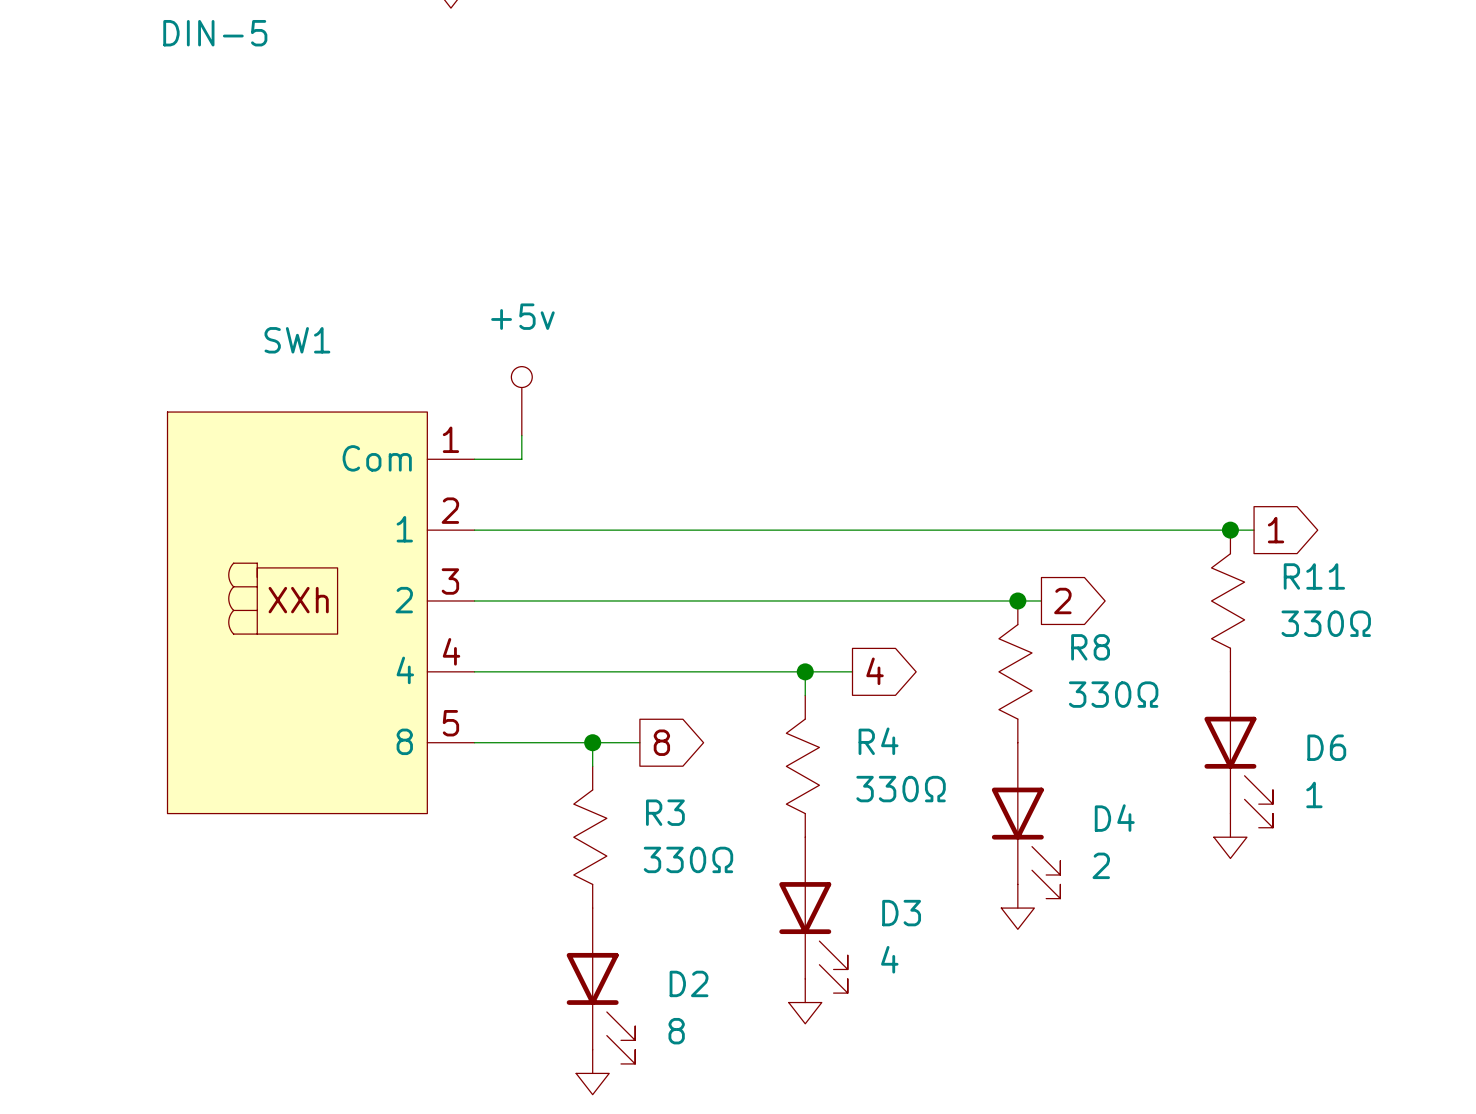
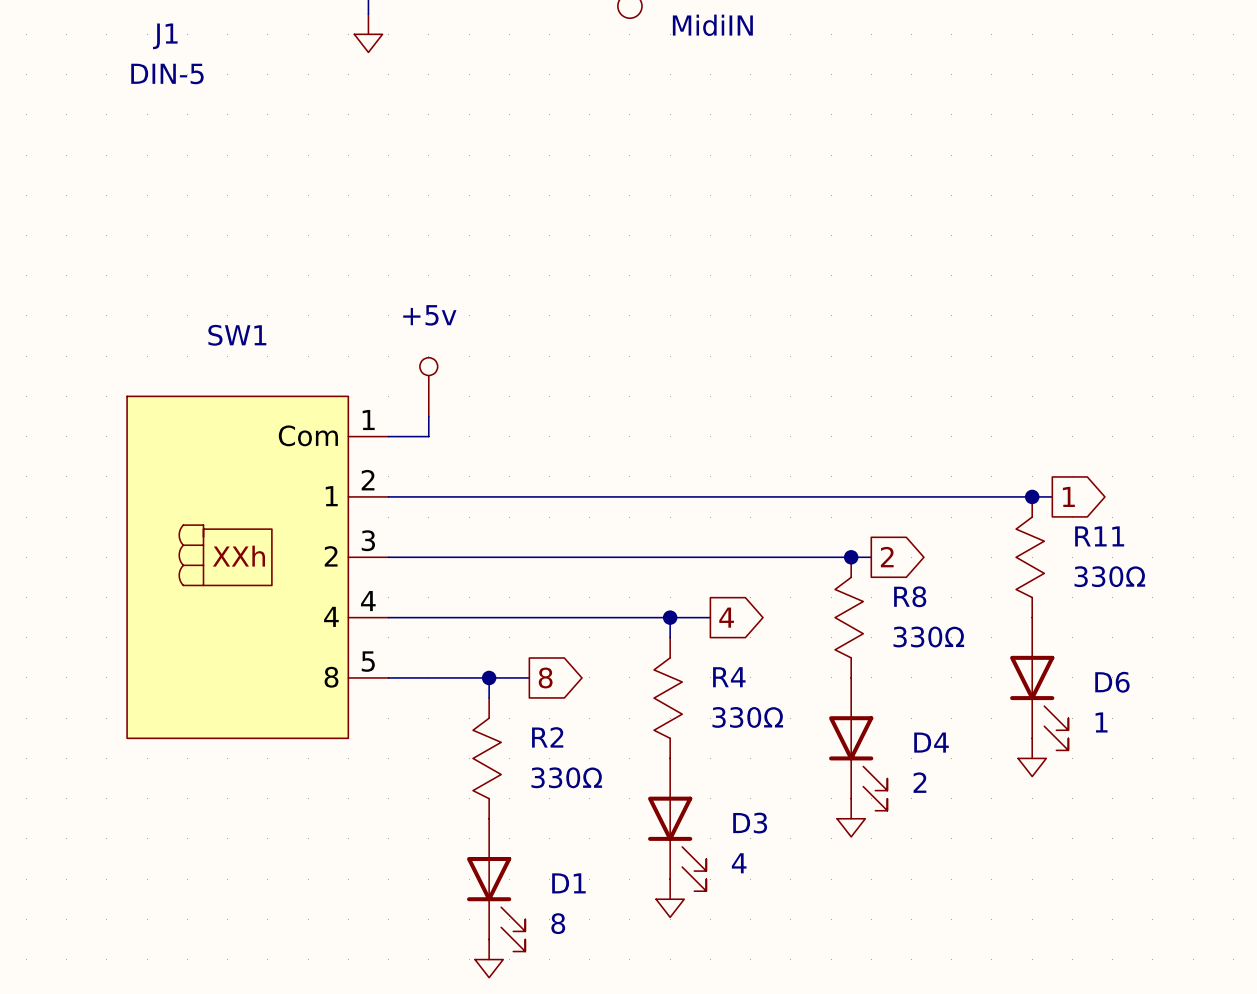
R3 name: R3 (665, 812) -> R2 (547, 737)
D2 name: D2 (689, 983) -> D1 (568, 883)

